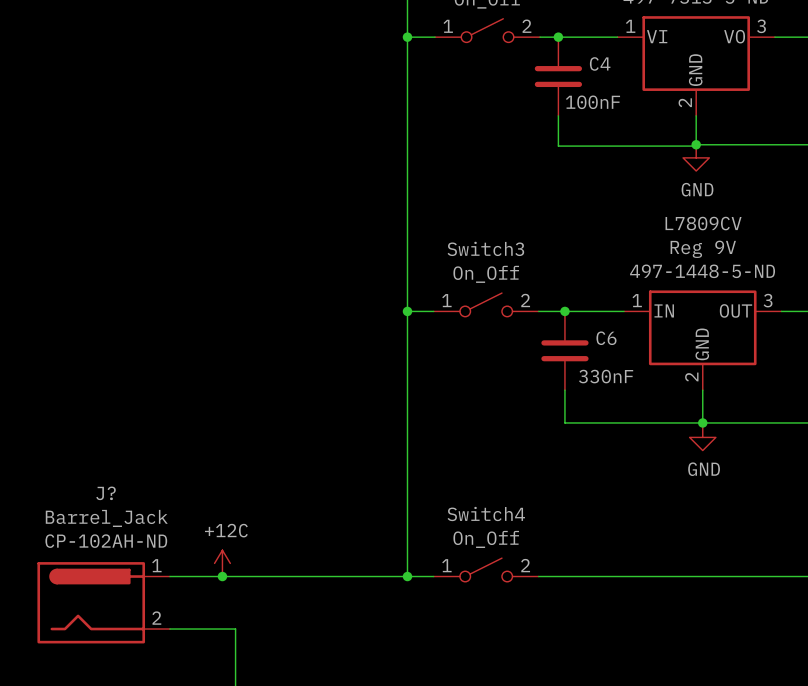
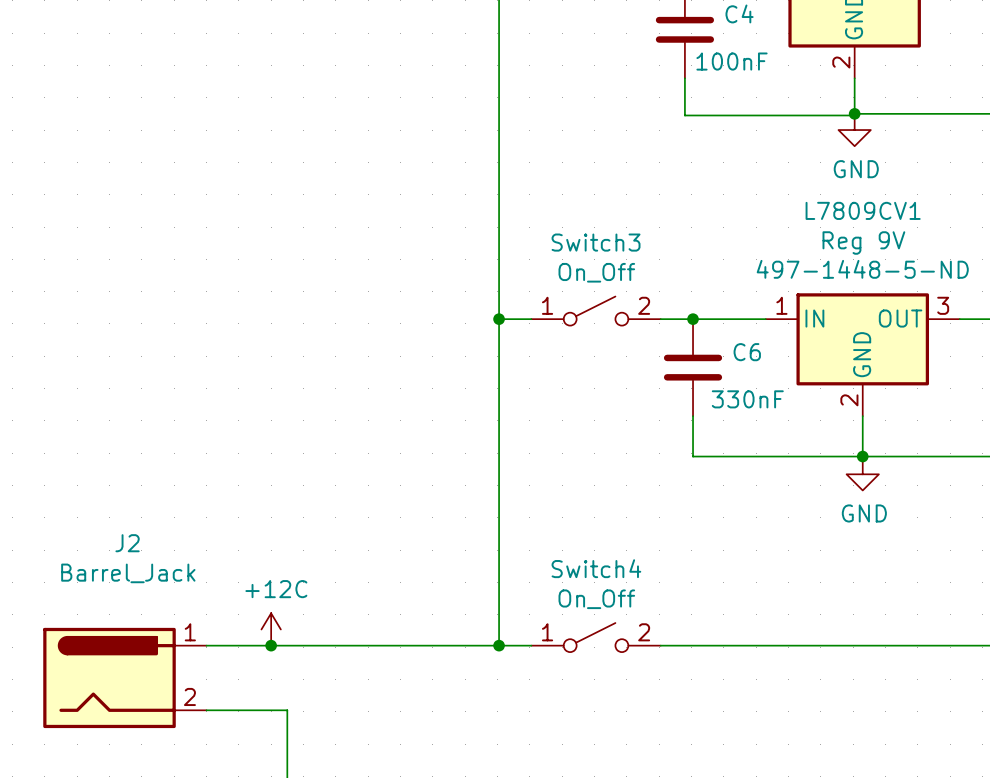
L7809CV name: L7809CV (703, 223) -> L7809CV1 (863, 210)
J? name: J? (106, 493) -> J2 (127, 543)
J? text: CP-102AH-ND (106, 541) -> none

